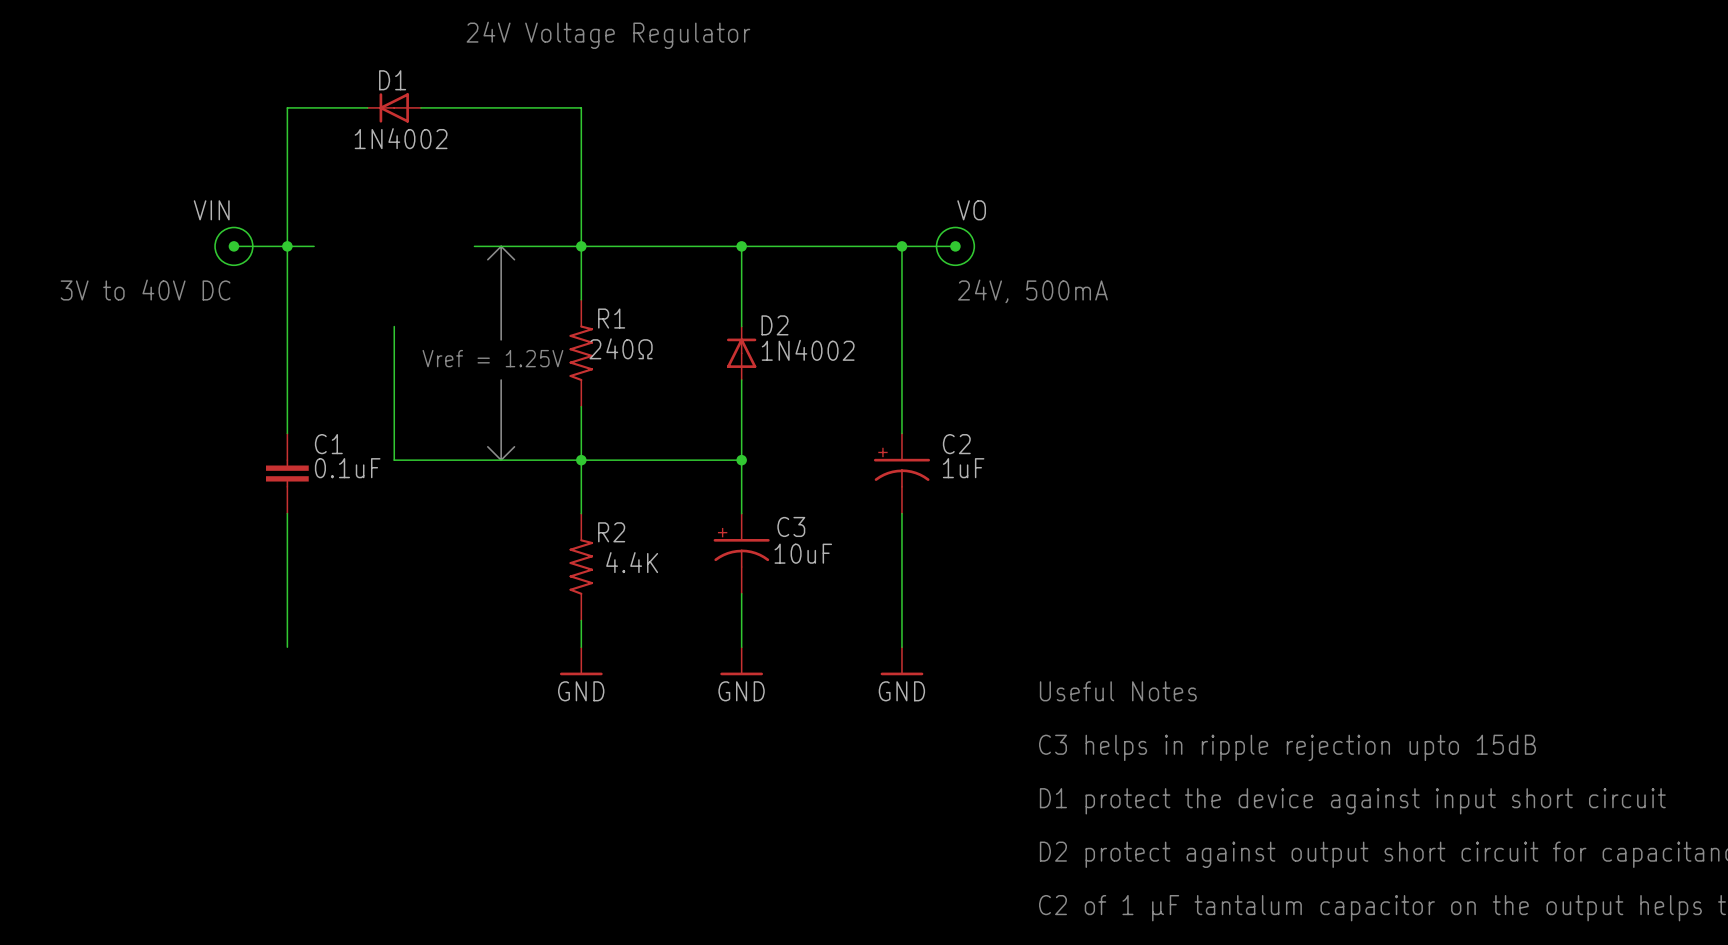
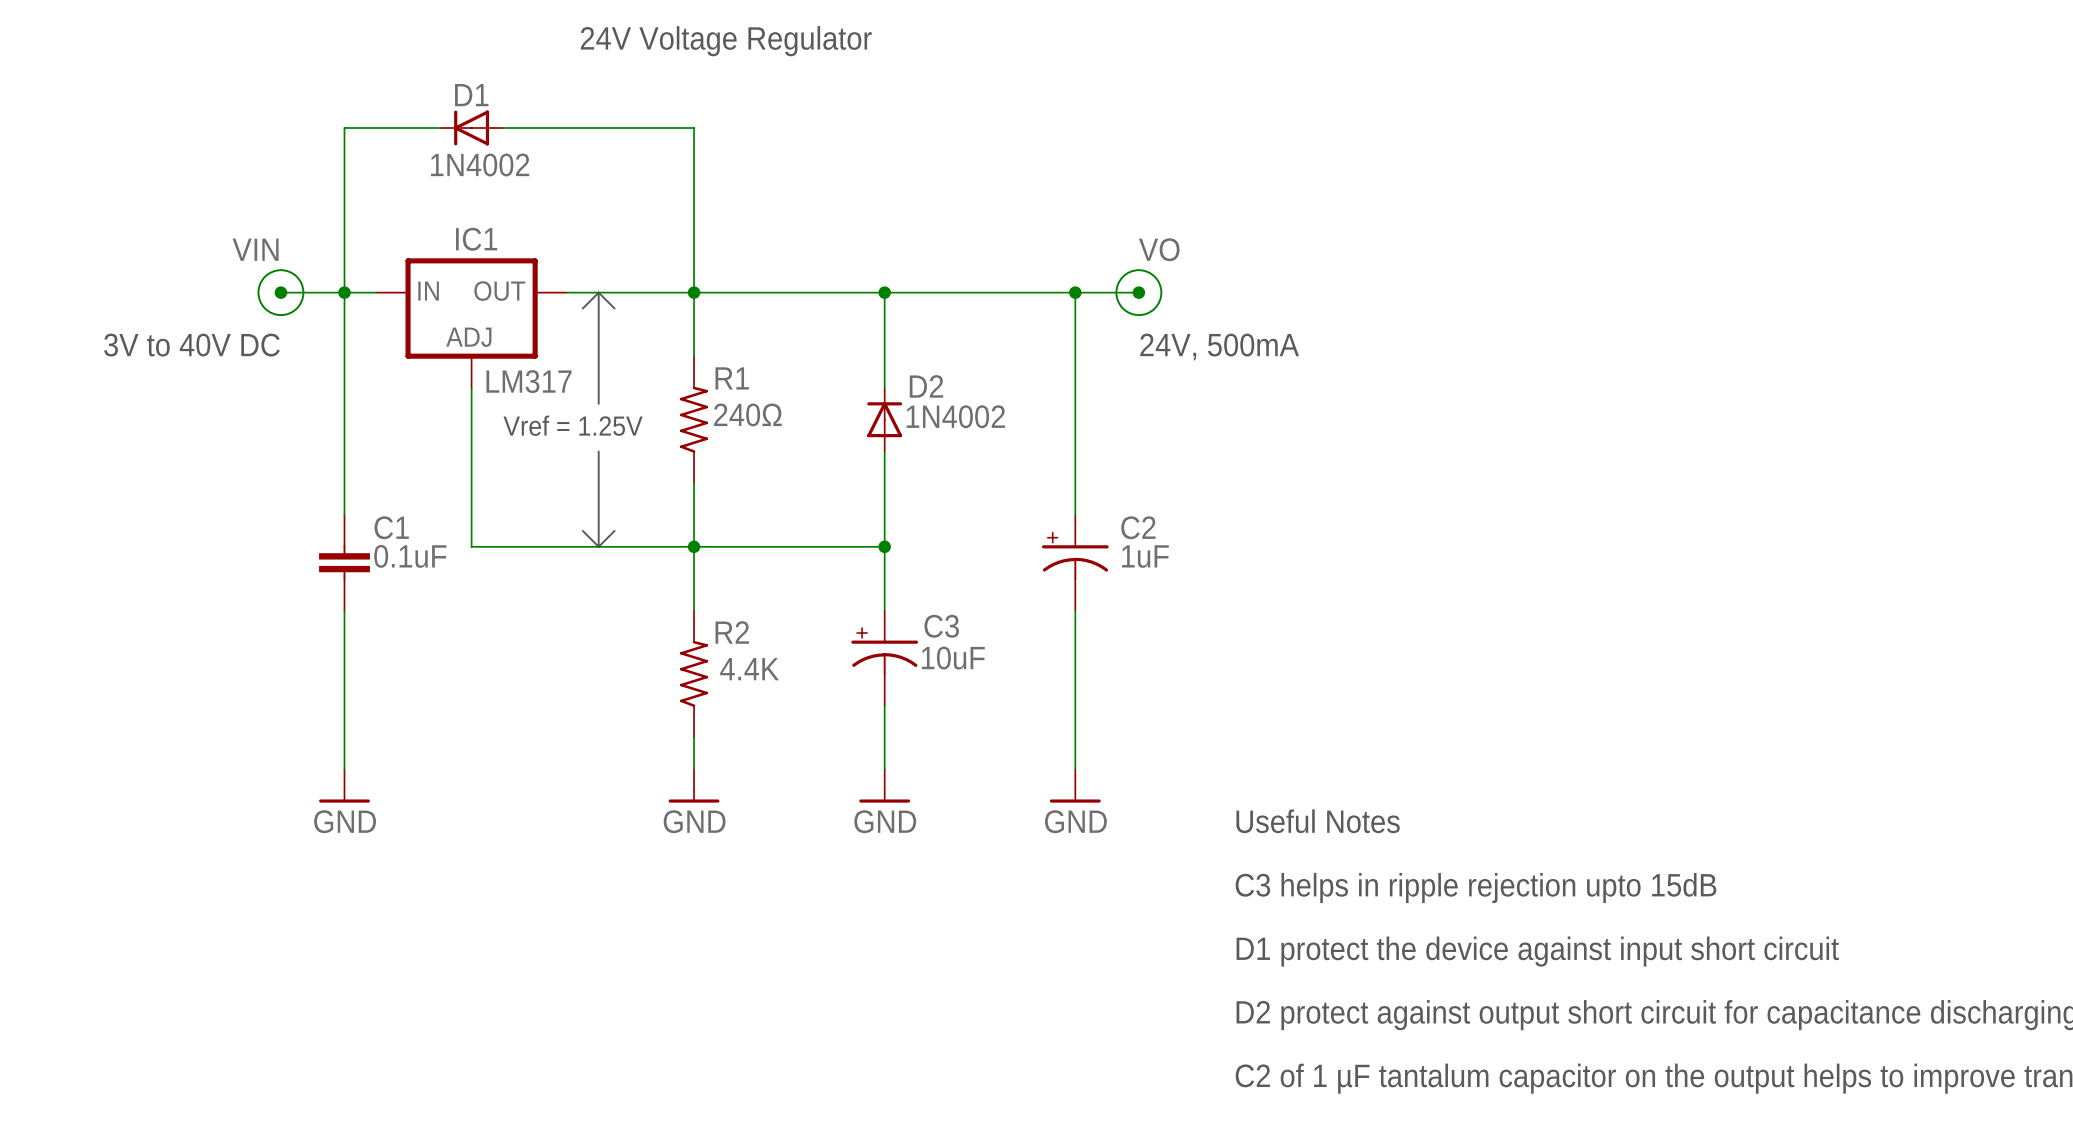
IC1: none -> (471, 323)
power symbol: none -> GND (344, 785)

